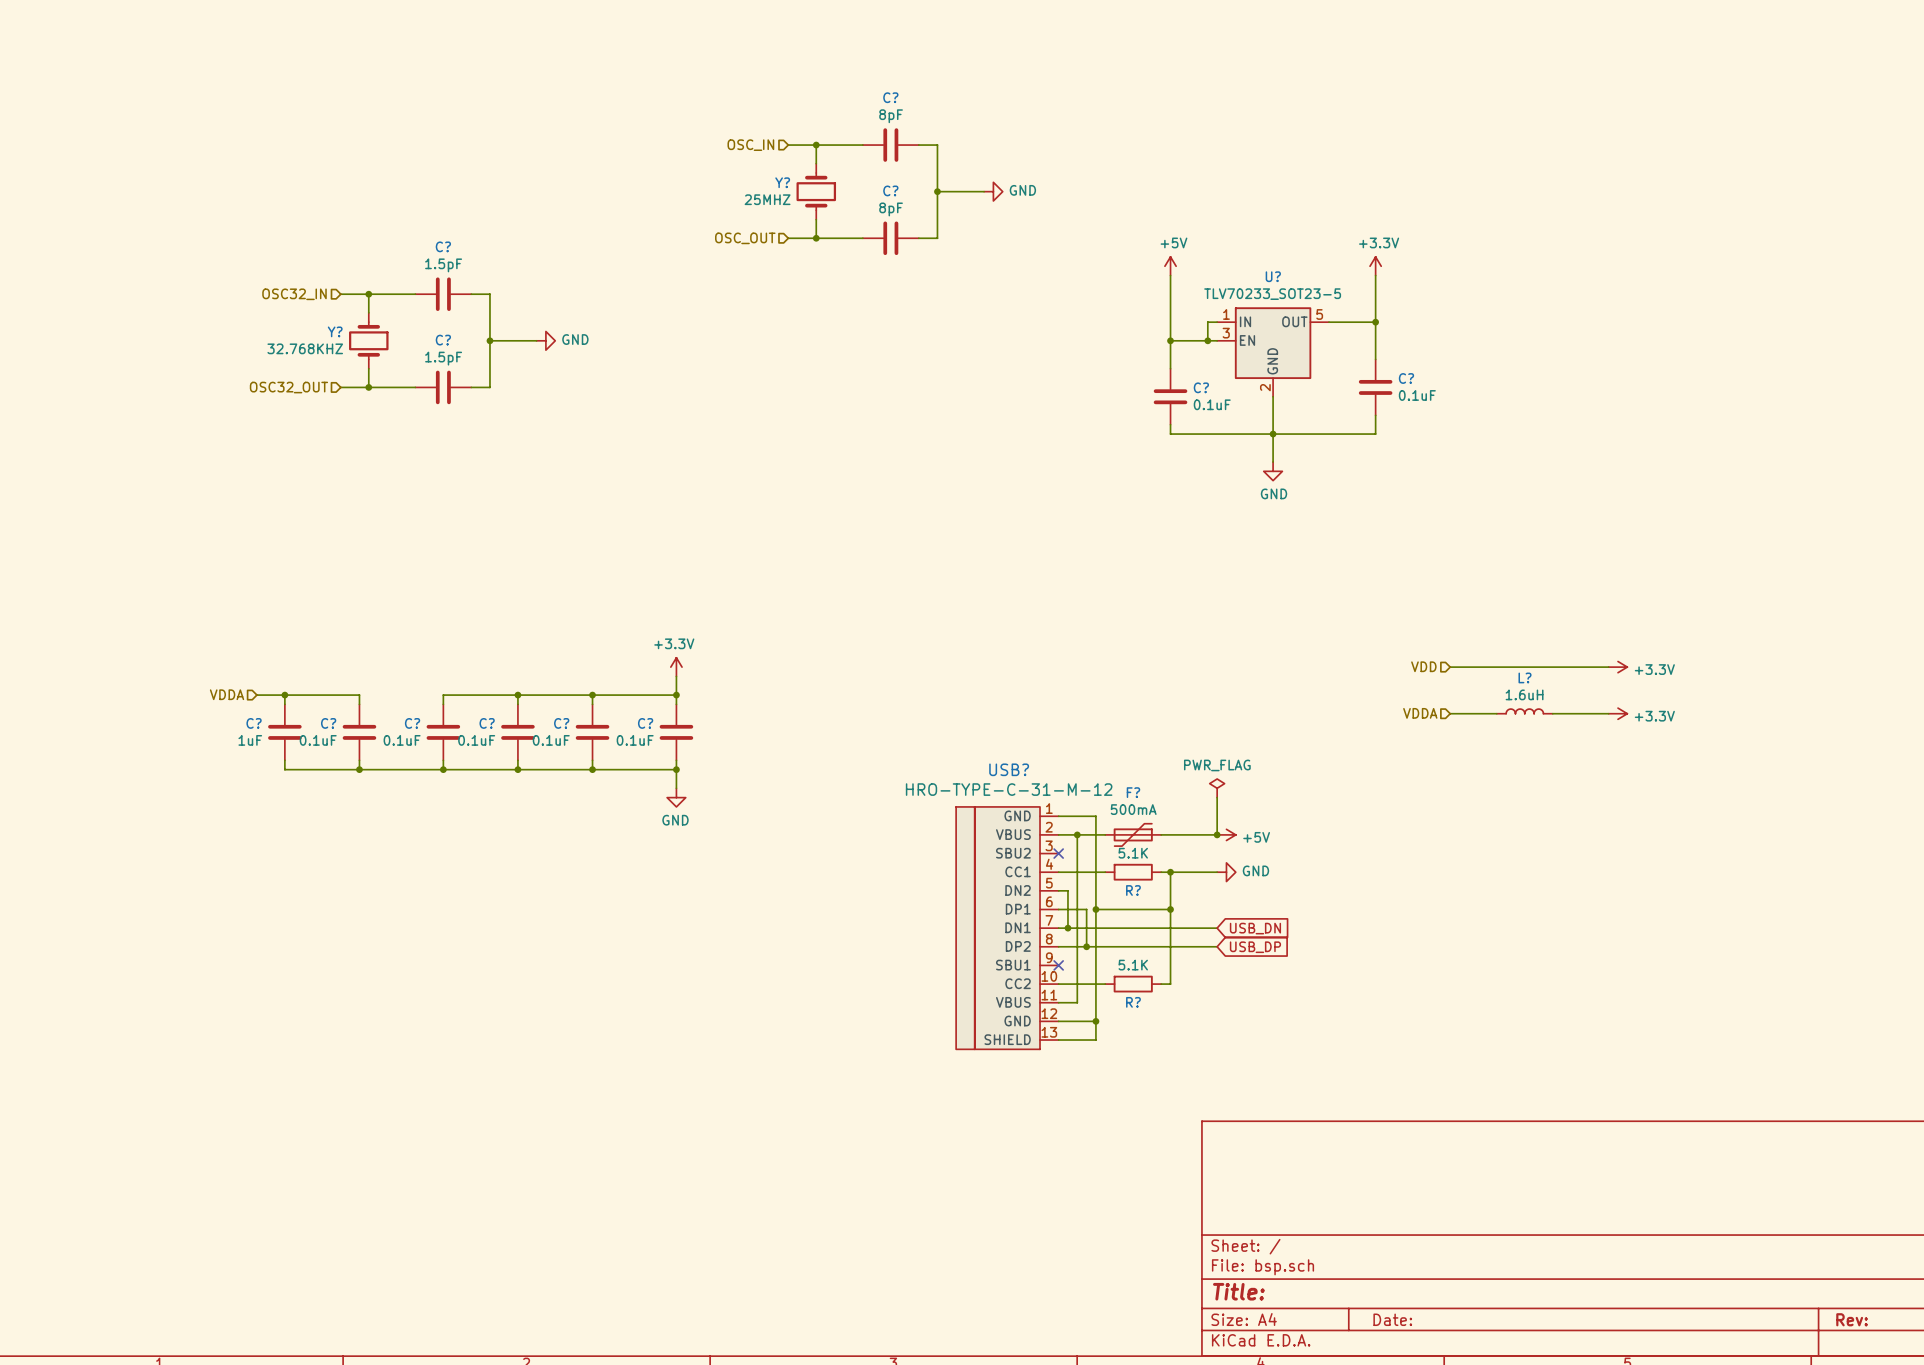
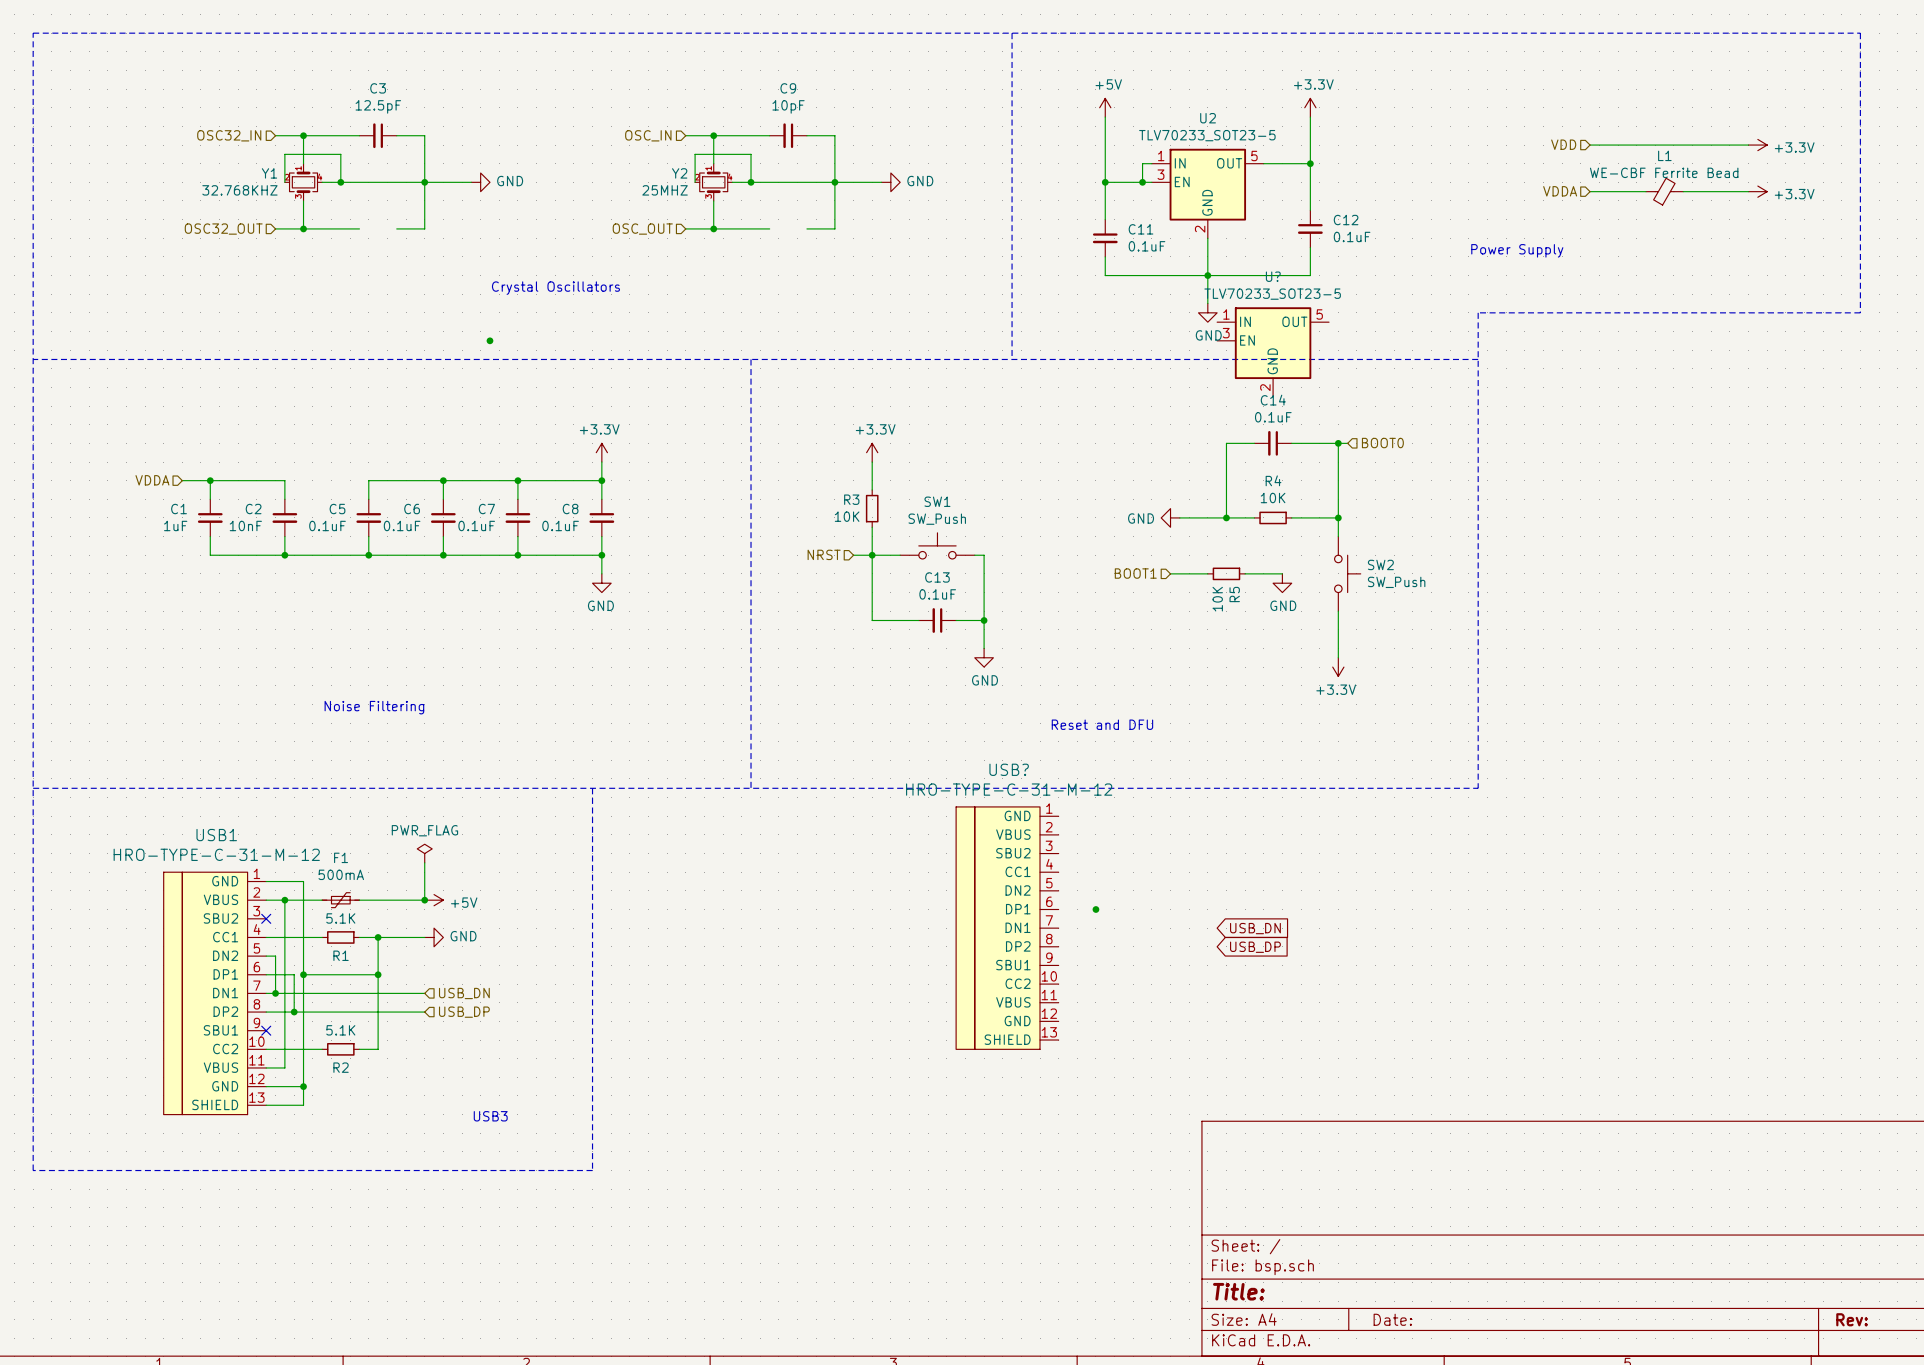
line: none -> (1012, 33) (1012, 359)
wire: none -> (1105, 117) (1105, 219)
wire: none -> (1310, 117) (1310, 210)
wire: none -> (275, 135) (359, 135)
wire: none -> (303, 135) (303, 163)
junction: none -> (303, 135)
C3: none -> 12.5pF (378, 135)
wire: none -> (396, 135) (424, 135) (424, 228) (396, 228)
wire: none -> (685, 135) (769, 135)
wire: none -> (713, 135) (713, 163)
junction: none -> (713, 135)
C9: none -> 10pF (788, 135)
wire: none -> (806, 135) (834, 135) (834, 228) (806, 228)
hierarchical label: none -> VDD (1563, 144)
hierarchical label position: OSC_IN (750, 145) -> OSC_IN (648, 135)
wire: (788, 145) (862, 145) -> none
wire: (816, 145) (816, 163) -> none
junction: (816, 145) -> none
C?: 8pF (890, 145) -> none
wire: (918, 145) (937, 145) (937, 238) (918, 238) -> none
wire: none -> (1590, 145) (1748, 145)
power symbol: none -> +3.3V (1757, 145)
junction: none -> (1310, 163)
wire: none -> (284, 182) (284, 154) (340, 154) (340, 182)
Y1: none -> 32.768KHZ (303, 182)
wire: none -> (322, 182) (471, 182)
junction: none -> (340, 182)
junction: none -> (424, 182)
power symbol: none -> GND (480, 182)
wire: none -> (695, 182) (695, 154) (751, 154) (751, 182)
Y2: none -> 25MHZ (713, 182)
wire: none -> (732, 182) (881, 182)
junction: none -> (751, 182)
junction: none -> (834, 182)
junction: none -> (1105, 182)
junction: none -> (1142, 182)
Y?: 25MHZ (816, 191) -> none
wire: (937, 191) (984, 191) -> none
junction: (937, 191) -> none
power symbol position: GND (993, 191) -> GND (890, 182)
hierarchical label: none -> VDDA (1560, 191)
wire: none -> (1590, 191) (1645, 191)
L1: none -> WE-CBF Ferrite Bead (1664, 191)
wire: none -> (1683, 191) (1748, 191)
power symbol: none -> +3.3V (1757, 191)
U2: none -> TLV70233_SOT23-5 (1207, 193)
wire: none -> (303, 200) (303, 228)
wire: none -> (713, 200) (713, 228)
wire: (816, 219) (816, 238) -> none
wire: none -> (275, 228) (359, 228)
junction: none -> (303, 228)
wire: none -> (685, 228) (769, 228)
junction: none -> (713, 228)
C12: none -> 0.1uF (1310, 228)
hierarchical label position: OSC_OUT (745, 238) -> OSC_OUT (642, 229)
wire: (788, 238) (862, 238) -> none
junction: (816, 238) -> none
C?: 8pF (890, 238) -> none
C11: none -> 0.1uF (1105, 238)
wire: none -> (1310, 247) (1310, 275) (1105, 275) (1105, 256)
text: none -> Power Supply (1517, 250)
power symbol position: +5V (1170, 266) -> +5V (1105, 107)
power symbol position: +3.3V (1375, 266) -> +3.3V (1310, 107)
wire: (1170, 275) (1170, 368) -> none
junction: none -> (1207, 275)
wire: (1375, 275) (1375, 359) -> none
text: none -> Crystal Oscillators (555, 288)
hierarchical label position: OSC32_IN (294, 294) -> OSC32_IN (229, 135)
wire: (340, 294) (415, 294) -> none
wire: (368, 294) (368, 312) -> none
junction: (368, 294) -> none
C?: 1.5pF (443, 294) -> none
wire: (471, 294) (489, 294) (489, 387) (471, 387) -> none
power symbol: none -> GND (1207, 312)
wire: (1217, 322) (1207, 322) (1207, 340) -> (1151, 163) (1142, 163) (1142, 182)
wire: (1329, 322) (1375, 322) -> (1263, 163) (1310, 163)
junction: (1375, 322) -> none
Y?: 32.768KHZ (368, 340) -> none
wire: (489, 340) (536, 340) -> none
power symbol: GND (545, 340) -> none
wire: (1170, 340) (1217, 340) -> (1105, 182) (1151, 182)
junction: (1170, 340) -> none
junction: (1207, 340) -> none
line: none -> (33, 359) (1478, 359)
line: none -> (751, 359) (751, 788)
wire: (368, 368) (368, 387) -> (443, 480) (443, 499)
hierarchical label position: OSC32_OUT (288, 387) -> OSC32_OUT (223, 229)
wire: (340, 387) (415, 387) -> none
junction: (368, 387) -> none
C?: 1.5pF (443, 387) -> none
C?: 0.1uF (1375, 387) -> none
C?: 0.1uF (1170, 396) -> none
wire: (1273, 396) (1273, 462) -> (1207, 238) (1207, 303)
wire: (1375, 415) (1375, 434) (1170, 434) (1170, 424) -> none
junction: (1273, 434) -> none
wire: none -> (1254, 443) (1226, 443) (1226, 517)
C14: none -> 0.1uF (1273, 443)
wire: none -> (1291, 443) (1347, 443)
wire: none -> (1338, 443) (1338, 536)
junction: none -> (1338, 443)
hierarchical label: none -> BOOT0 (1382, 443)
power symbol: none -> +3.3V (601, 452)
power symbol: none -> +3.3V (872, 452)
wire: none -> (601, 462) (601, 499)
wire: none -> (872, 462) (872, 489)
power symbol: GND (1273, 471) -> none
hierarchical label: none -> VDDA (152, 480)
wire: none -> (182, 480) (284, 480) (284, 499)
wire: none -> (210, 480) (210, 499)
junction: none -> (210, 480)
junction: none -> (443, 480)
wire: none -> (517, 480) (517, 499)
junction: none -> (517, 480)
wire: none -> (601, 480) (368, 480) (368, 499)
junction: none -> (601, 480)
R3: none -> 10K (872, 508)
C1: none -> 1uF (210, 517)
C2: none -> 10nF (284, 517)
C5: none -> 0.1uF (368, 517)
C6: none -> 0.1uF (443, 517)
C7: none -> 0.1uF (517, 517)
C8: none -> 0.1uF (601, 517)
power symbol: none -> GND (1170, 517)
wire: none -> (1179, 517) (1254, 517)
junction: none -> (1226, 517)
R4: none -> 10K (1273, 517)
wire: none -> (1291, 517) (1338, 517)
junction: none -> (1338, 517)
wire: none -> (872, 527) (872, 620) (918, 620)
wire: none -> (210, 536) (210, 555) (601, 555)
wire: none -> (284, 536) (284, 555)
wire: none -> (368, 536) (368, 555)
wire: none -> (443, 536) (443, 555)
wire: none -> (517, 536) (517, 555)
wire: none -> (601, 536) (601, 573)
SW1: none -> SW_Push (937, 545)
hierarchical label: none -> NRST (824, 554)
junction: none -> (284, 555)
junction: none -> (368, 555)
junction: none -> (443, 555)
junction: none -> (517, 555)
junction: none -> (601, 555)
wire: none -> (853, 555) (900, 555)
junction: none -> (872, 555)
wire: none -> (974, 555) (984, 555) (984, 648)
hierarchical label: none -> BOOT1 (1135, 573)
wire: none -> (1170, 573) (1207, 573)
R5: none -> 10K (1226, 573)
wire: none -> (1245, 573) (1282, 573)
SW2: none -> SW_Push (1347, 573)
power symbol: none -> GND (601, 583)
power symbol: none -> GND (1282, 583)
wire: none -> (1338, 611) (1338, 657)
C13: none -> 0.1uF (937, 620)
wire: none -> (956, 620) (984, 620)
junction: none -> (984, 620)
power symbol: none -> GND (984, 657)
hierarchical label: VDD (1423, 666) -> none
power symbol: +3.3V (676, 667) -> none
power symbol: none -> +3.3V (1338, 667)
wire: (1450, 667) (1608, 667) -> none
power symbol: +3.3V (1618, 667) -> none
wire: (676, 676) (676, 704) -> none
hierarchical label: VDDA (227, 694) -> none
wire: (256, 695) (359, 695) (359, 704) -> none
wire: (284, 695) (284, 704) -> none
junction: (284, 695) -> none
wire: (517, 695) (517, 704) -> none
junction: (517, 695) -> none
wire: (592, 695) (592, 704) -> none
junction: (592, 695) -> none
wire: (676, 695) (443, 695) (443, 704) -> none
junction: (676, 695) -> none
text: none -> Noise Filtering (374, 707)
L?: 1.6uH (1524, 711) -> none
hierarchical label: VDDA (1420, 713) -> none
wire: (1450, 713) (1496, 713) -> none
wire: (1552, 713) (1608, 713) -> none
power symbol: +3.3V (1618, 713) -> none
text: none -> Reset and DFU (1102, 724)
C?: 1uF (284, 732) -> none
C?: 0.1uF (359, 732) -> none
C?: 0.1uF (443, 732) -> none
C?: 0.1uF (517, 732) -> none
C?: 0.1uF (592, 732) -> none
C?: 0.1uF (676, 732) -> none
wire: (284, 760) (284, 769) (676, 769) -> none
wire: (359, 760) (359, 769) -> none
wire: (443, 760) (443, 769) -> none
wire: (517, 760) (517, 769) -> none
wire: (592, 760) (592, 769) -> none
wire: (676, 760) (676, 788) -> none
junction: (359, 769) -> none
junction: (443, 769) -> none
junction: (517, 769) -> none
junction: (592, 769) -> none
junction: (676, 769) -> none
line: none -> (33, 788) (1478, 788) (1478, 312) (1860, 312) (1860, 33) (33, 33) (33, 1170) (592, 1170) (592, 788)
power symbol: PWR_FLAG (1217, 788) -> none
power symbol: GND (676, 797) -> none
wire: (1217, 797) (1217, 834) (1161, 834) -> none
wire: (1058, 816) (1095, 816) (1095, 1040) (1058, 1040) -> none
wire: (1058, 834) (1105, 834) -> none
wire: (1077, 834) (1077, 1002) (1058, 1002) -> none
junction: (1077, 834) -> none
F?: 500mA (1133, 834) -> none
junction: (1217, 834) -> none
power symbol: +5V (1226, 834) -> none
power symbol: none -> PWR_FLAG (424, 853)
no-connect mark: (1058, 853) -> none
wire: none -> (424, 862) (424, 900) (359, 900)
wire: (1058, 872) (1105, 872) -> none
R?: 5.1K (1133, 872) -> none
wire: (1161, 872) (1217, 872) -> none
wire: (1170, 872) (1170, 984) (1161, 984) -> none
junction: (1170, 872) -> none
power symbol: GND (1226, 872) -> none
wire: none -> (266, 881) (303, 881) (303, 1105) (266, 1105)
wire: (1058, 890) (1067, 890) (1067, 928) -> none
wire: none -> (266, 900) (322, 900)
wire: none -> (284, 900) (284, 1067) (266, 1067)
junction: none -> (284, 900)
F1: none -> 500mA (340, 900)
junction: none -> (424, 900)
power symbol: none -> +5V (434, 900)
wire: (1058, 909) (1086, 909) (1086, 946) -> none
wire: (1095, 909) (1170, 909) -> none
junction: (1170, 909) -> none
no-connect mark: none -> (266, 918)
wire: (1058, 928) (1217, 928) -> none
junction: (1067, 928) -> none
wire: none -> (266, 937) (322, 937)
R1: none -> 5.1K (340, 937)
wire: none -> (359, 937) (424, 937)
wire: none -> (378, 937) (378, 1049) (359, 1049)
junction: none -> (378, 937)
power symbol: none -> GND (434, 937)
wire: (1058, 946) (1217, 946) -> none
junction: (1086, 946) -> none
wire: none -> (266, 956) (275, 956) (275, 993)
no-connect mark: (1058, 965) -> none
wire: none -> (266, 974) (294, 974) (294, 1012)
wire: none -> (303, 974) (378, 974)
junction: none -> (303, 974)
junction: none -> (378, 974)
wire: (1058, 984) (1105, 984) -> none
R?: 5.1K (1133, 984) -> none
USB1: none -> HRO-TYPE-C-31-M-12 (214, 993)
wire: none -> (266, 993) (424, 993)
junction: none -> (275, 993)
hierarchical label: none -> USB_DN (464, 993)
wire: none -> (266, 1012) (424, 1012)
junction: none -> (294, 1012)
hierarchical label: none -> USB_DP (464, 1012)
wire: (1058, 1021) (1095, 1021) -> none
junction: (1095, 1021) -> none
no-connect mark: none -> (266, 1030)
wire: none -> (266, 1049) (322, 1049)
R2: none -> 5.1K (340, 1049)
wire: none -> (266, 1086) (303, 1086)
junction: none -> (303, 1086)
text: none -> USB3 (490, 1116)

